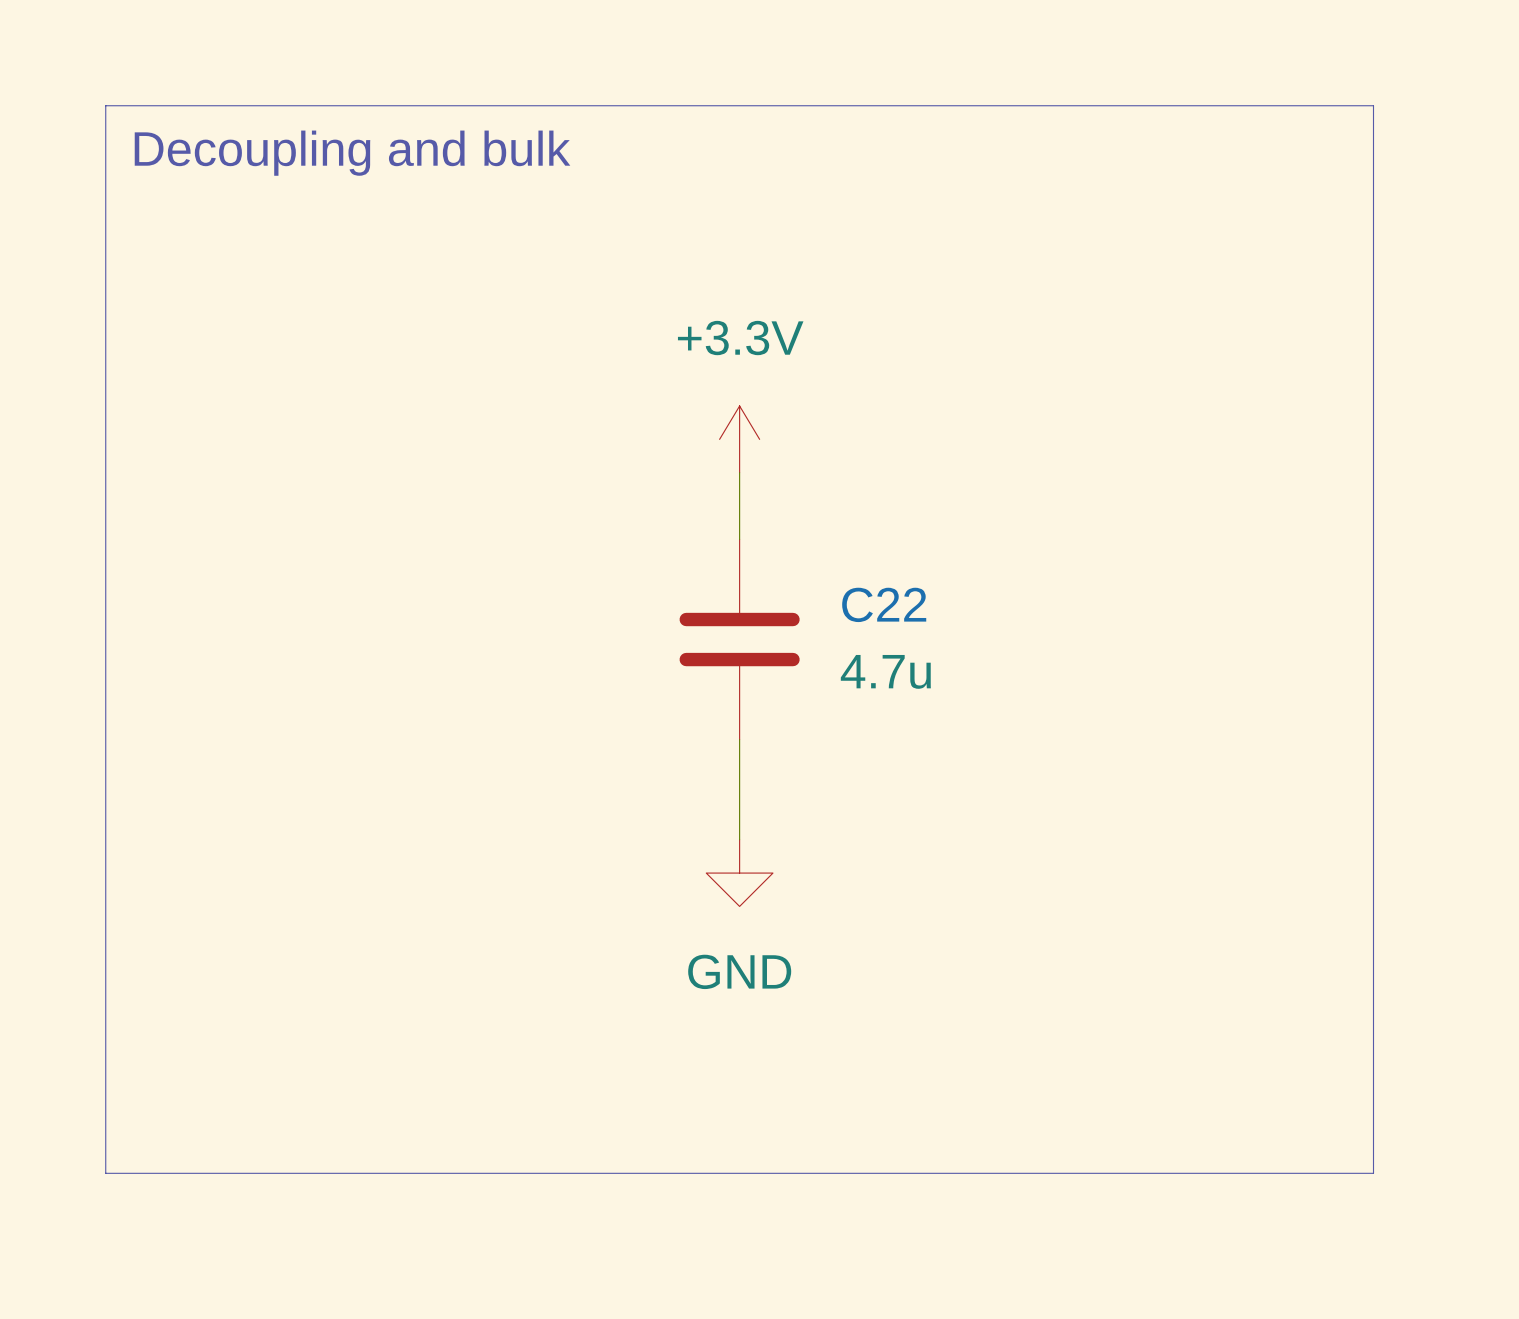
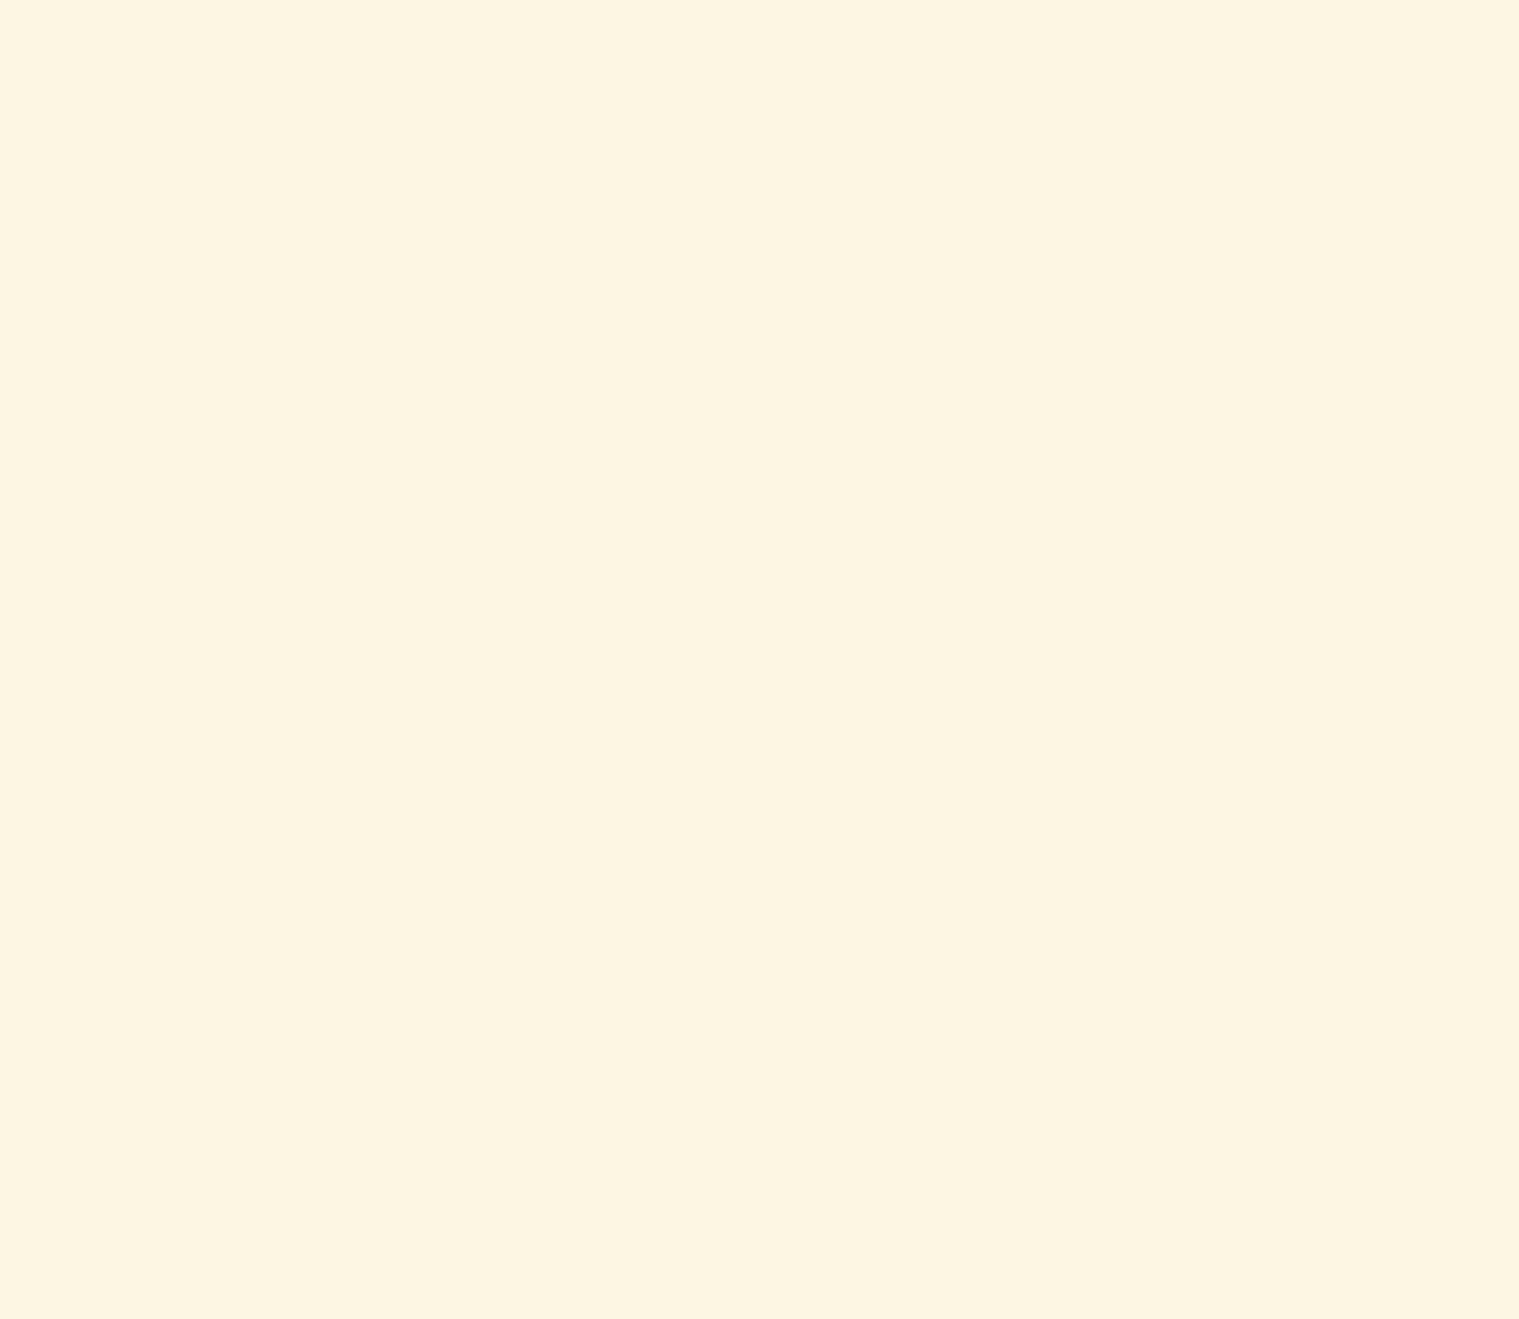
line: (105, 105) (1373, 105) (1373, 1173) (105, 1173) (105, 105) -> none
text: Decoupling and bulk (352, 153) -> none
power symbol: +3.3V (739, 439) -> none
wire: (739, 472) (739, 539) -> none
C22: 4.7u (739, 639) -> none
wire: (739, 739) (739, 839) -> none
power symbol: GND (739, 873) -> none

